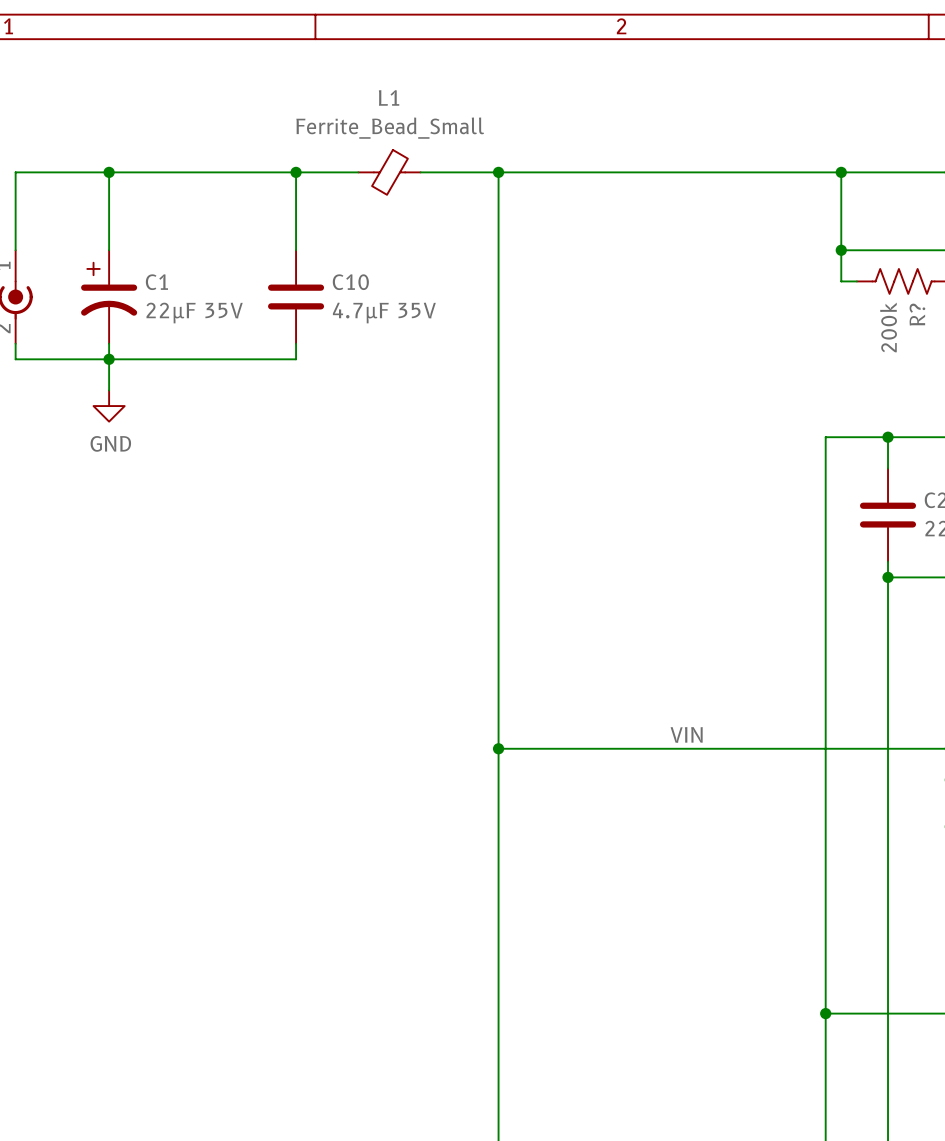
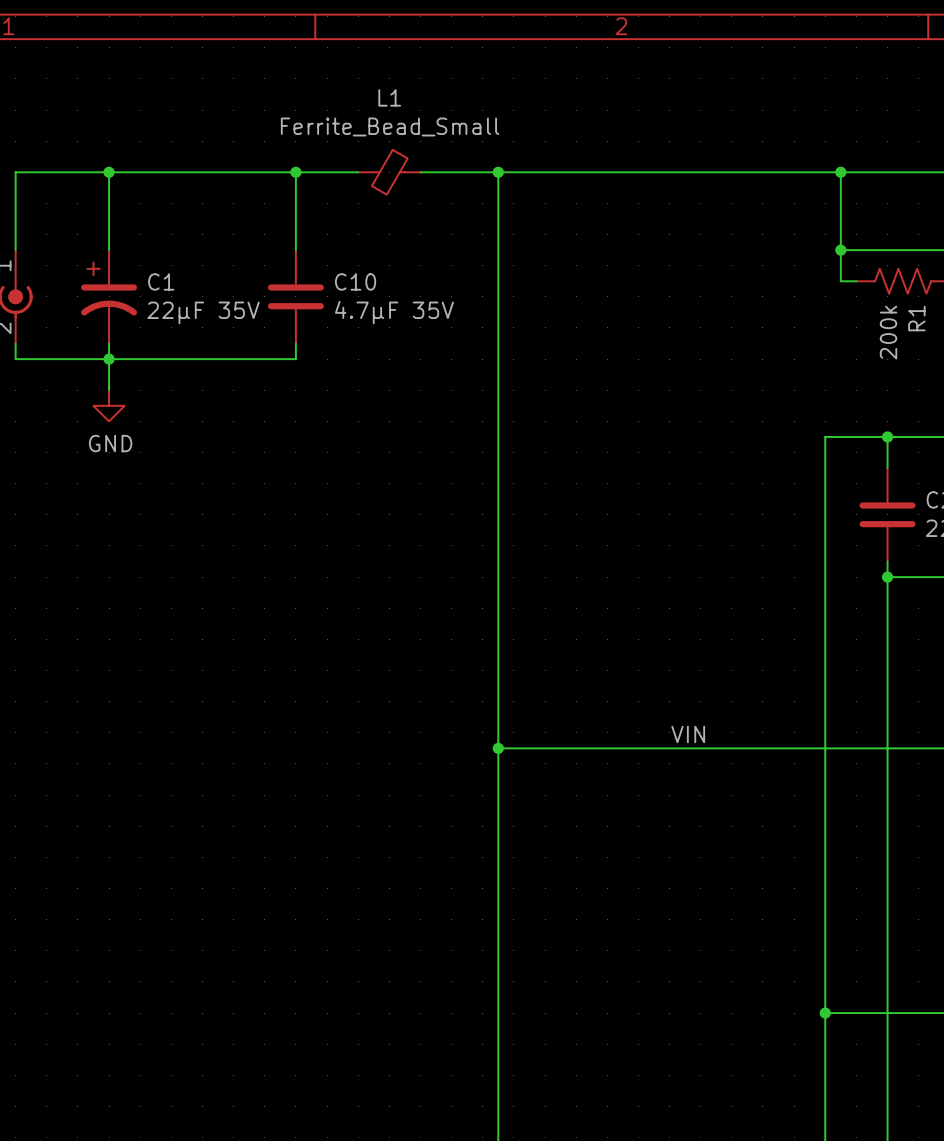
R? name: R? (917, 314) -> R1 (916, 318)

